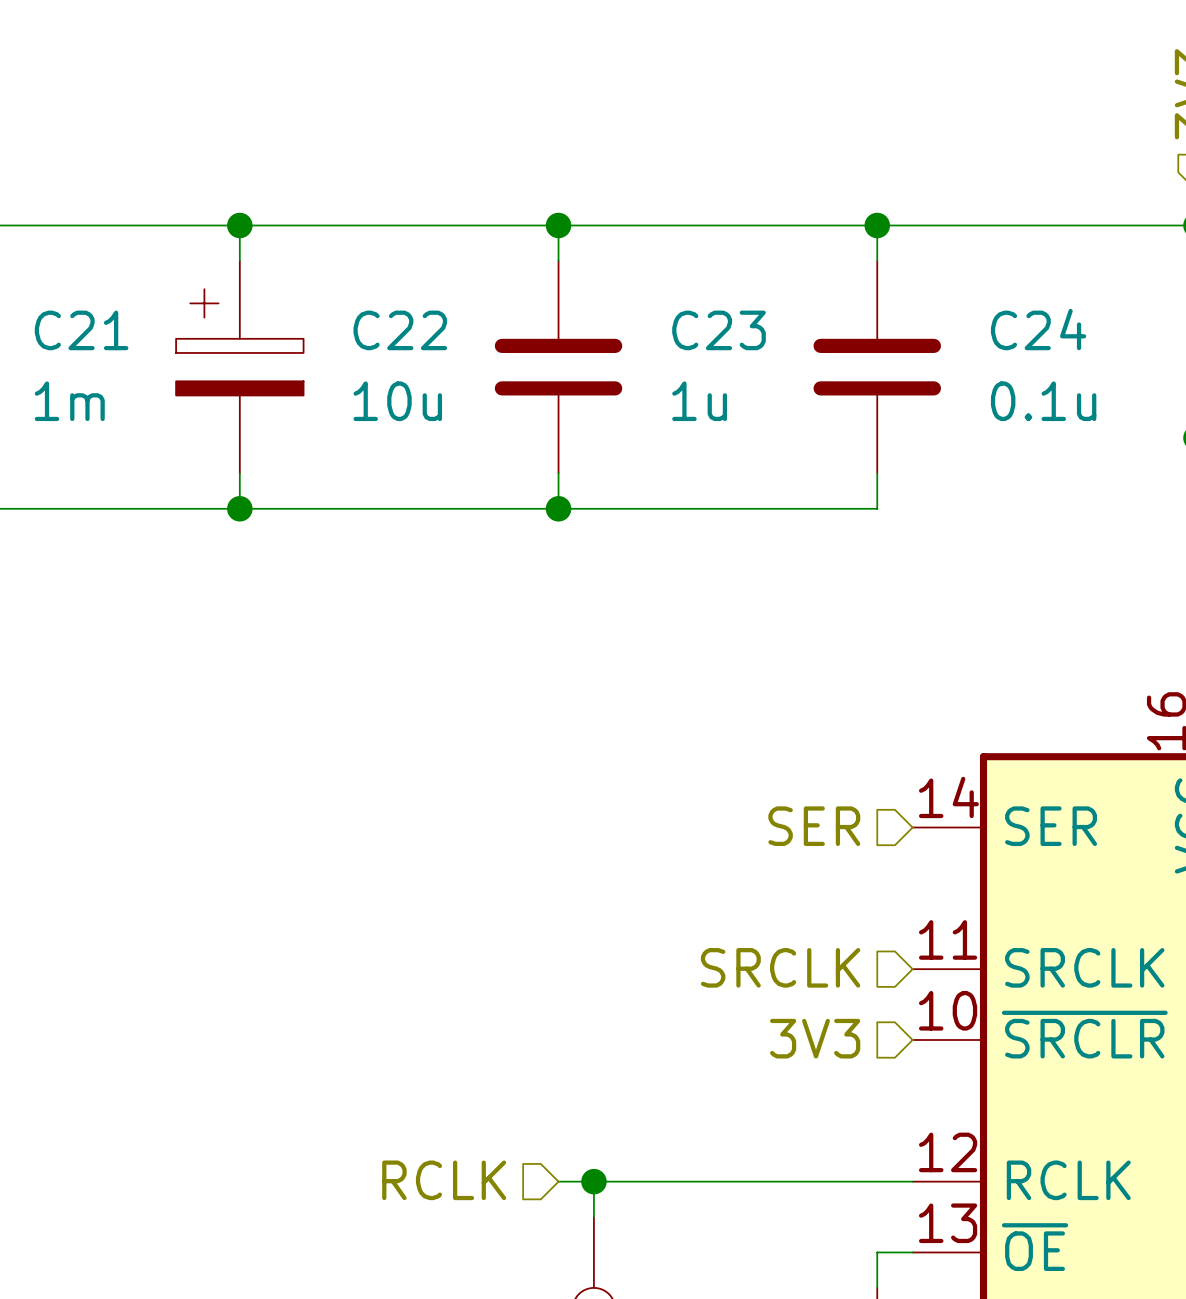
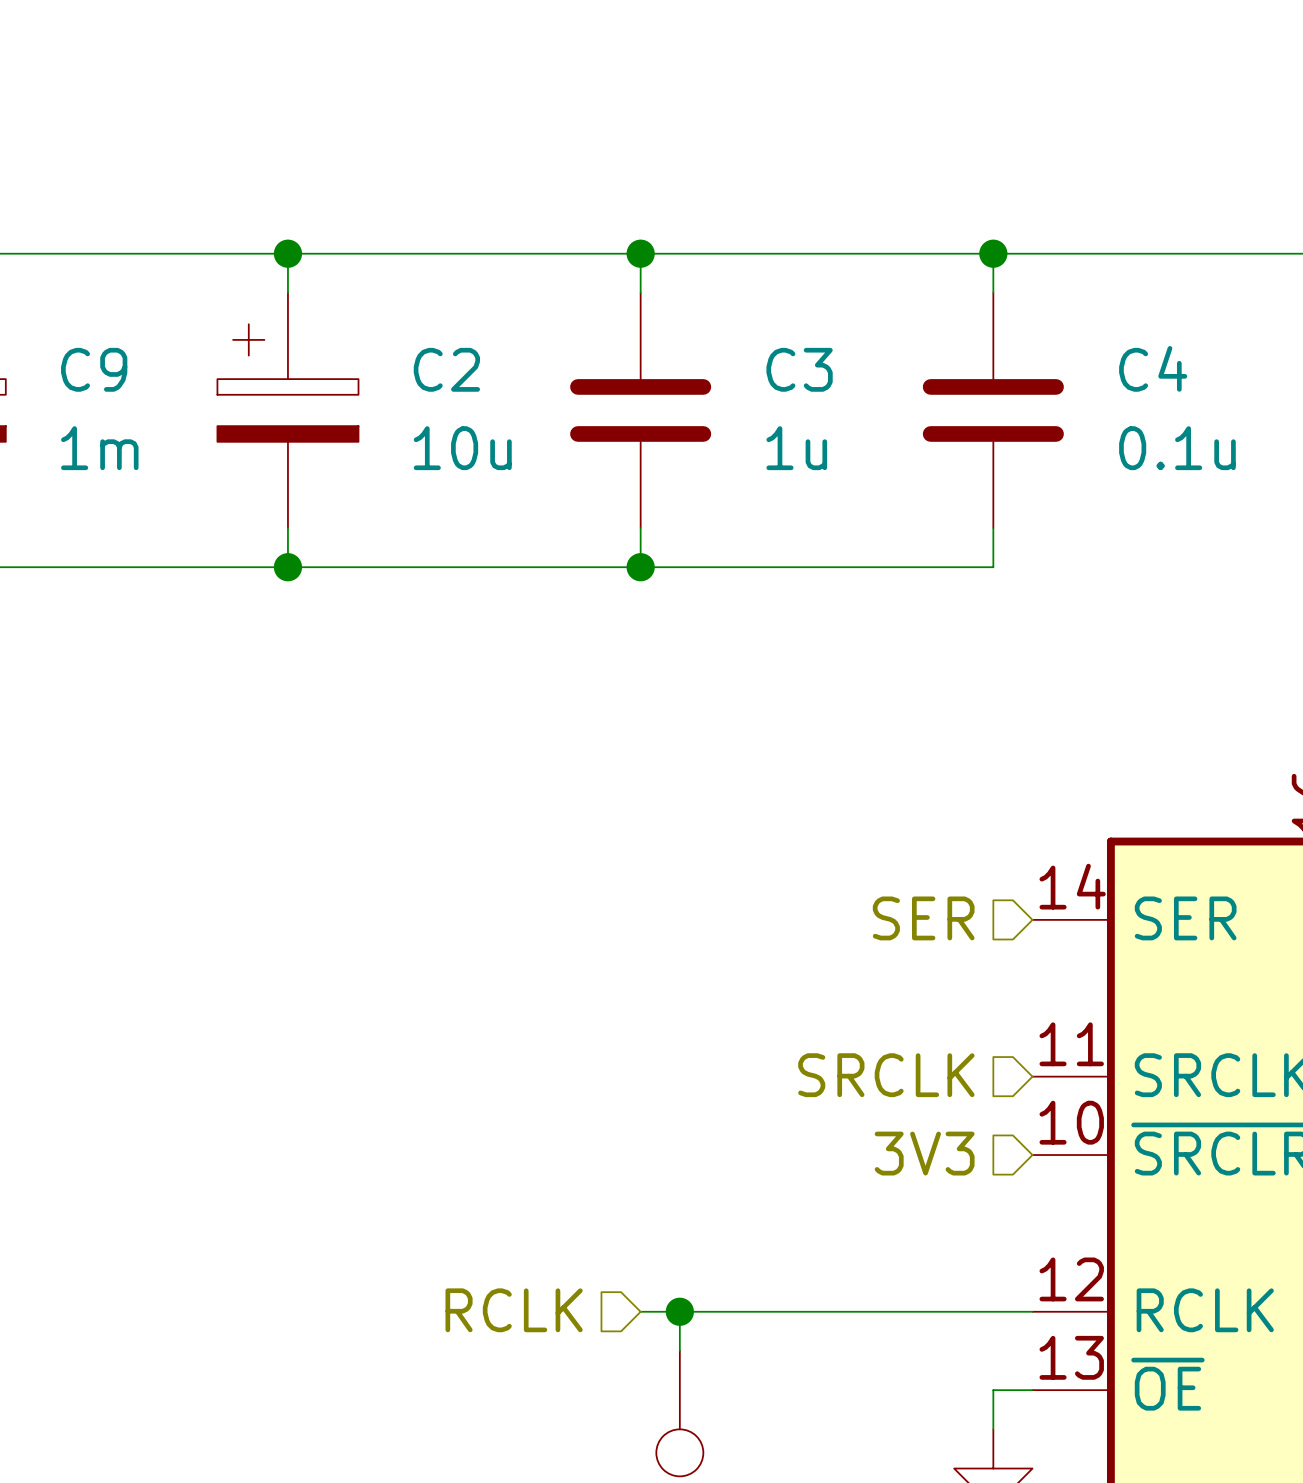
C24 name: C24 (1038, 329) -> C4 (1153, 368)
C21 name: C21 (81, 330) -> C9 (94, 369)
C22 name: C22 (400, 330) -> C2 (446, 369)
C23 name: C23 (719, 330) -> C3 (799, 369)

